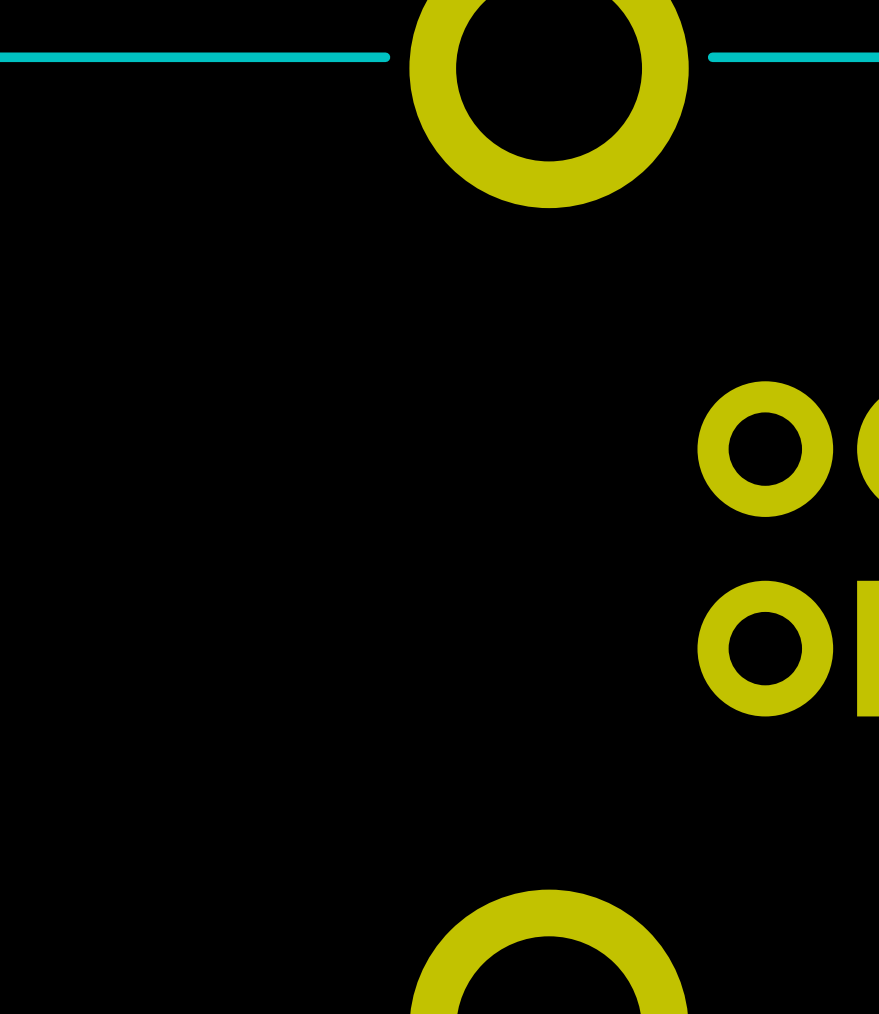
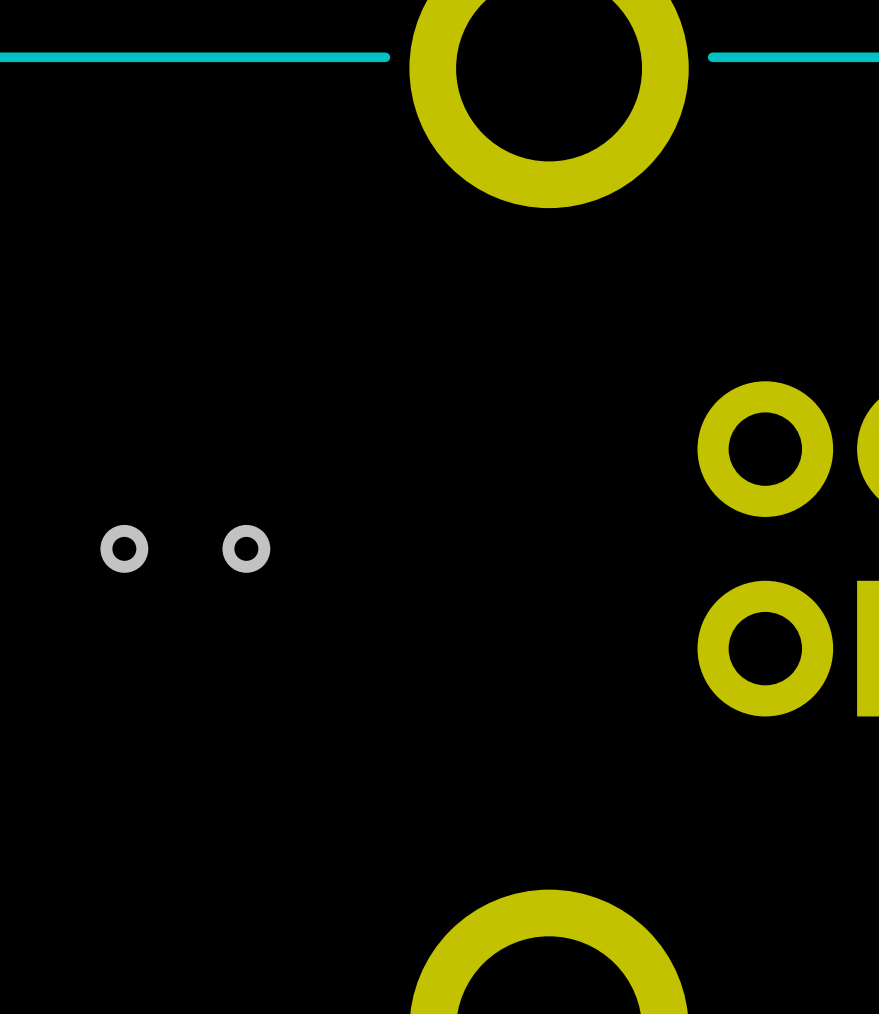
via: none -> (124, 548)
via: none -> (246, 548)

